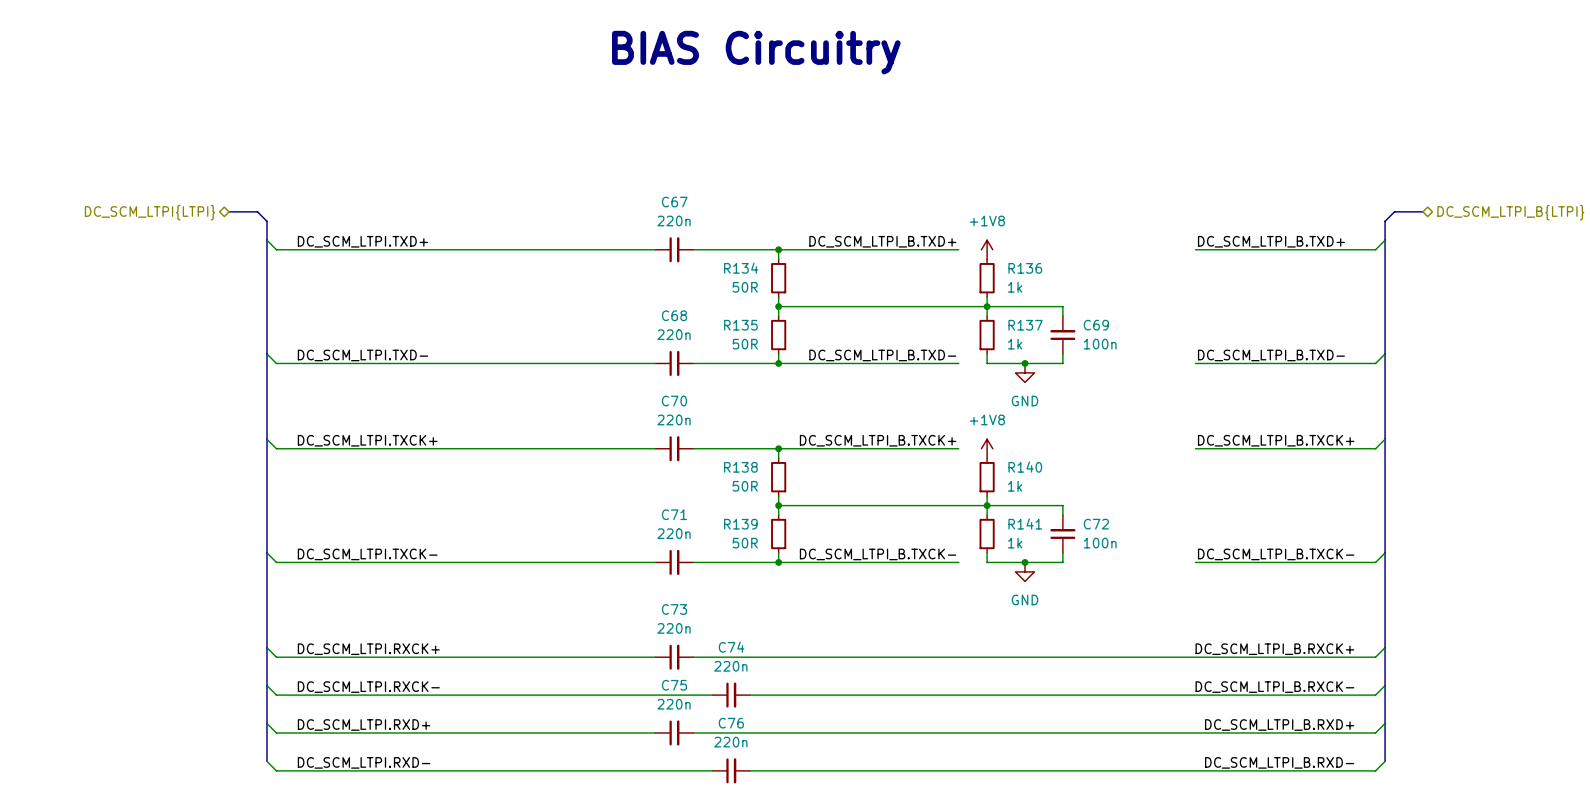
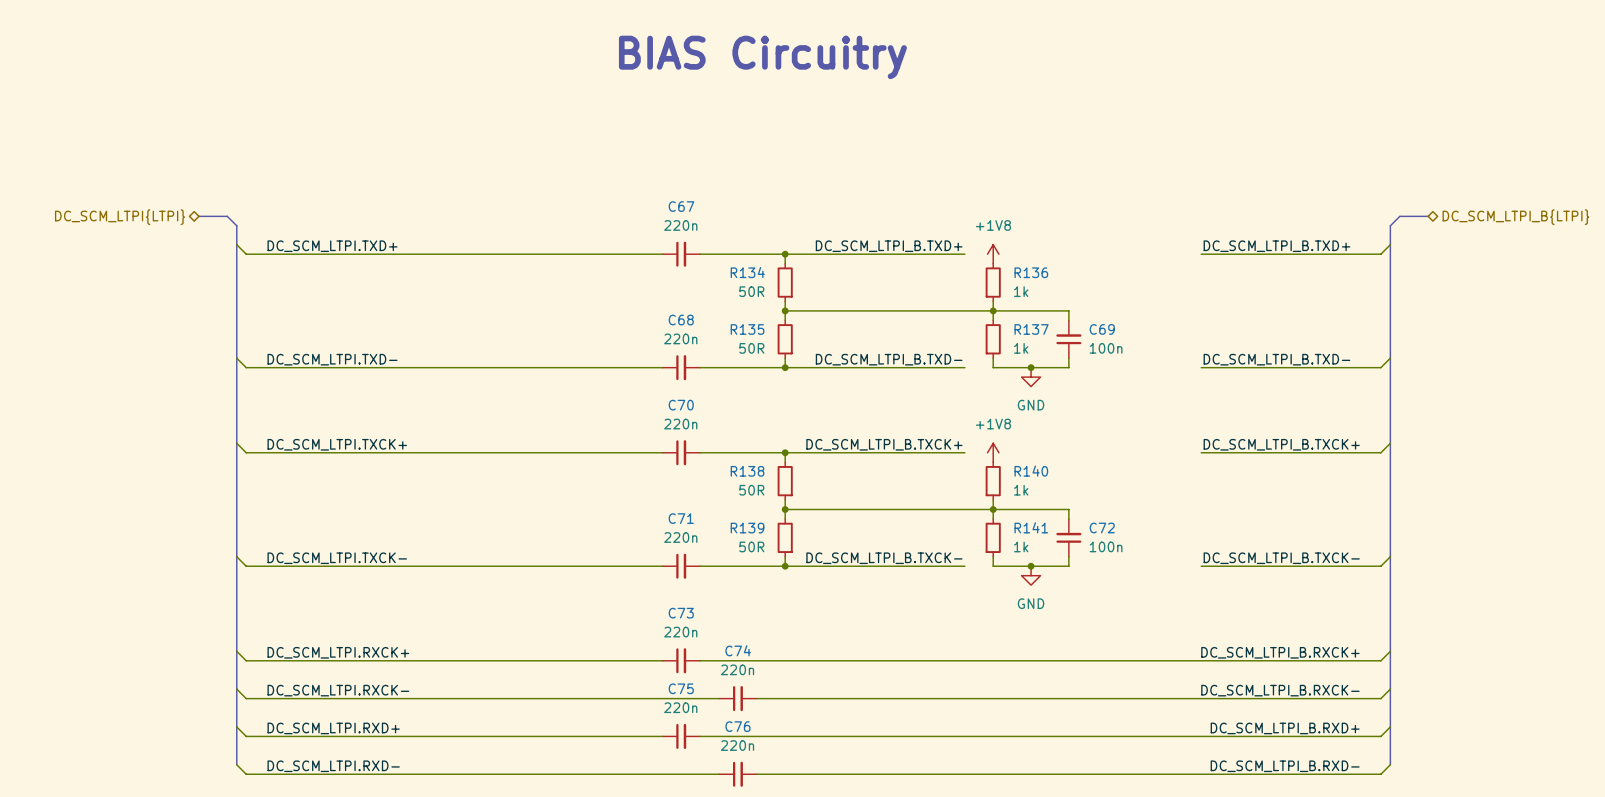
bus: (229, 211) (257, 211) (266, 221) (266, 761) -> (198, 216) (227, 216) (236, 225) (236, 764)
hierarchical label position: DC_SCM_LTPI{LTPI} (149, 212) -> DC_SCM_LTPI{LTPI} (120, 217)
wire: (266, 240) (276, 249) -> (236, 244) (246, 254) (284, 254)
label position: DC_SCM_LTPI.TXD+ (362, 241) -> DC_SCM_LTPI.TXD+ (332, 246)
wire: (266, 353) (276, 363) -> (236, 358) (246, 367) (284, 367)
label position: DC_SCM_LTPI.TXD- (362, 355) -> DC_SCM_LTPI.TXD- (332, 359)
wire: (266, 439) (276, 448) -> (236, 443) (246, 452) (284, 452)
label position: DC_SCM_LTPI.TXCK+ (367, 440) -> DC_SCM_LTPI.TXCK+ (337, 444)
wire: (266, 552) (276, 562) -> (236, 556) (246, 566) (284, 566)
label position: DC_SCM_LTPI.TXCK- (367, 554) -> DC_SCM_LTPI.TXCK- (337, 558)
wire: (266, 647) (276, 657) -> (236, 651) (246, 660) (284, 660)
label position: DC_SCM_LTPI.RXCK+ (368, 649) -> DC_SCM_LTPI.RXCK+ (338, 652)
wire: (266, 685) (276, 695) -> (236, 689) (246, 698) (284, 698)
label position: DC_SCM_LTPI.RXCK- (368, 687) -> DC_SCM_LTPI.RXCK- (338, 690)
wire: (266, 723) (276, 732) -> (236, 726) (246, 736) (284, 736)
label position: DC_SCM_LTPI.RXD+ (364, 724) -> DC_SCM_LTPI.RXD+ (333, 728)
wire: (266, 761) (276, 770) -> (236, 764) (246, 774) (284, 774)
label position: DC_SCM_LTPI.RXD- (364, 762) -> DC_SCM_LTPI.RXD- (333, 766)

